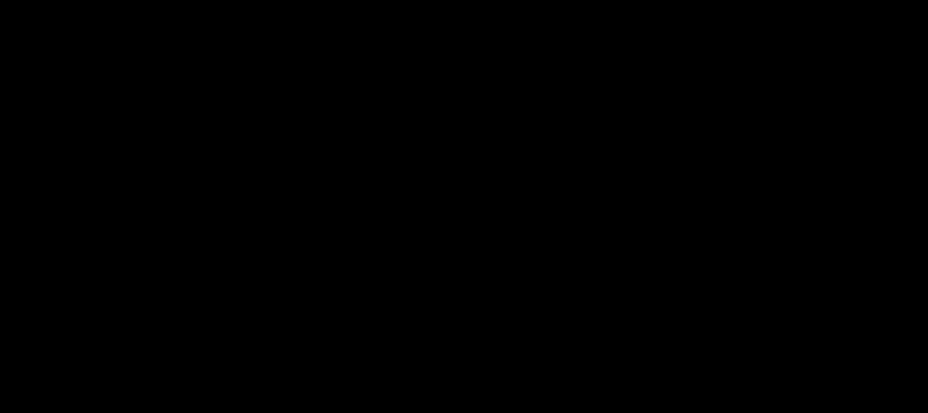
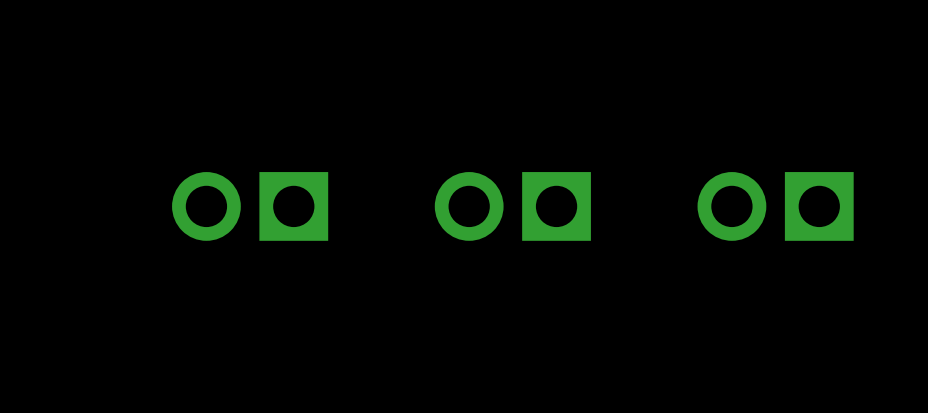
part: none -> (250, 206)
part: none -> (512, 206)
part: none -> (775, 206)

